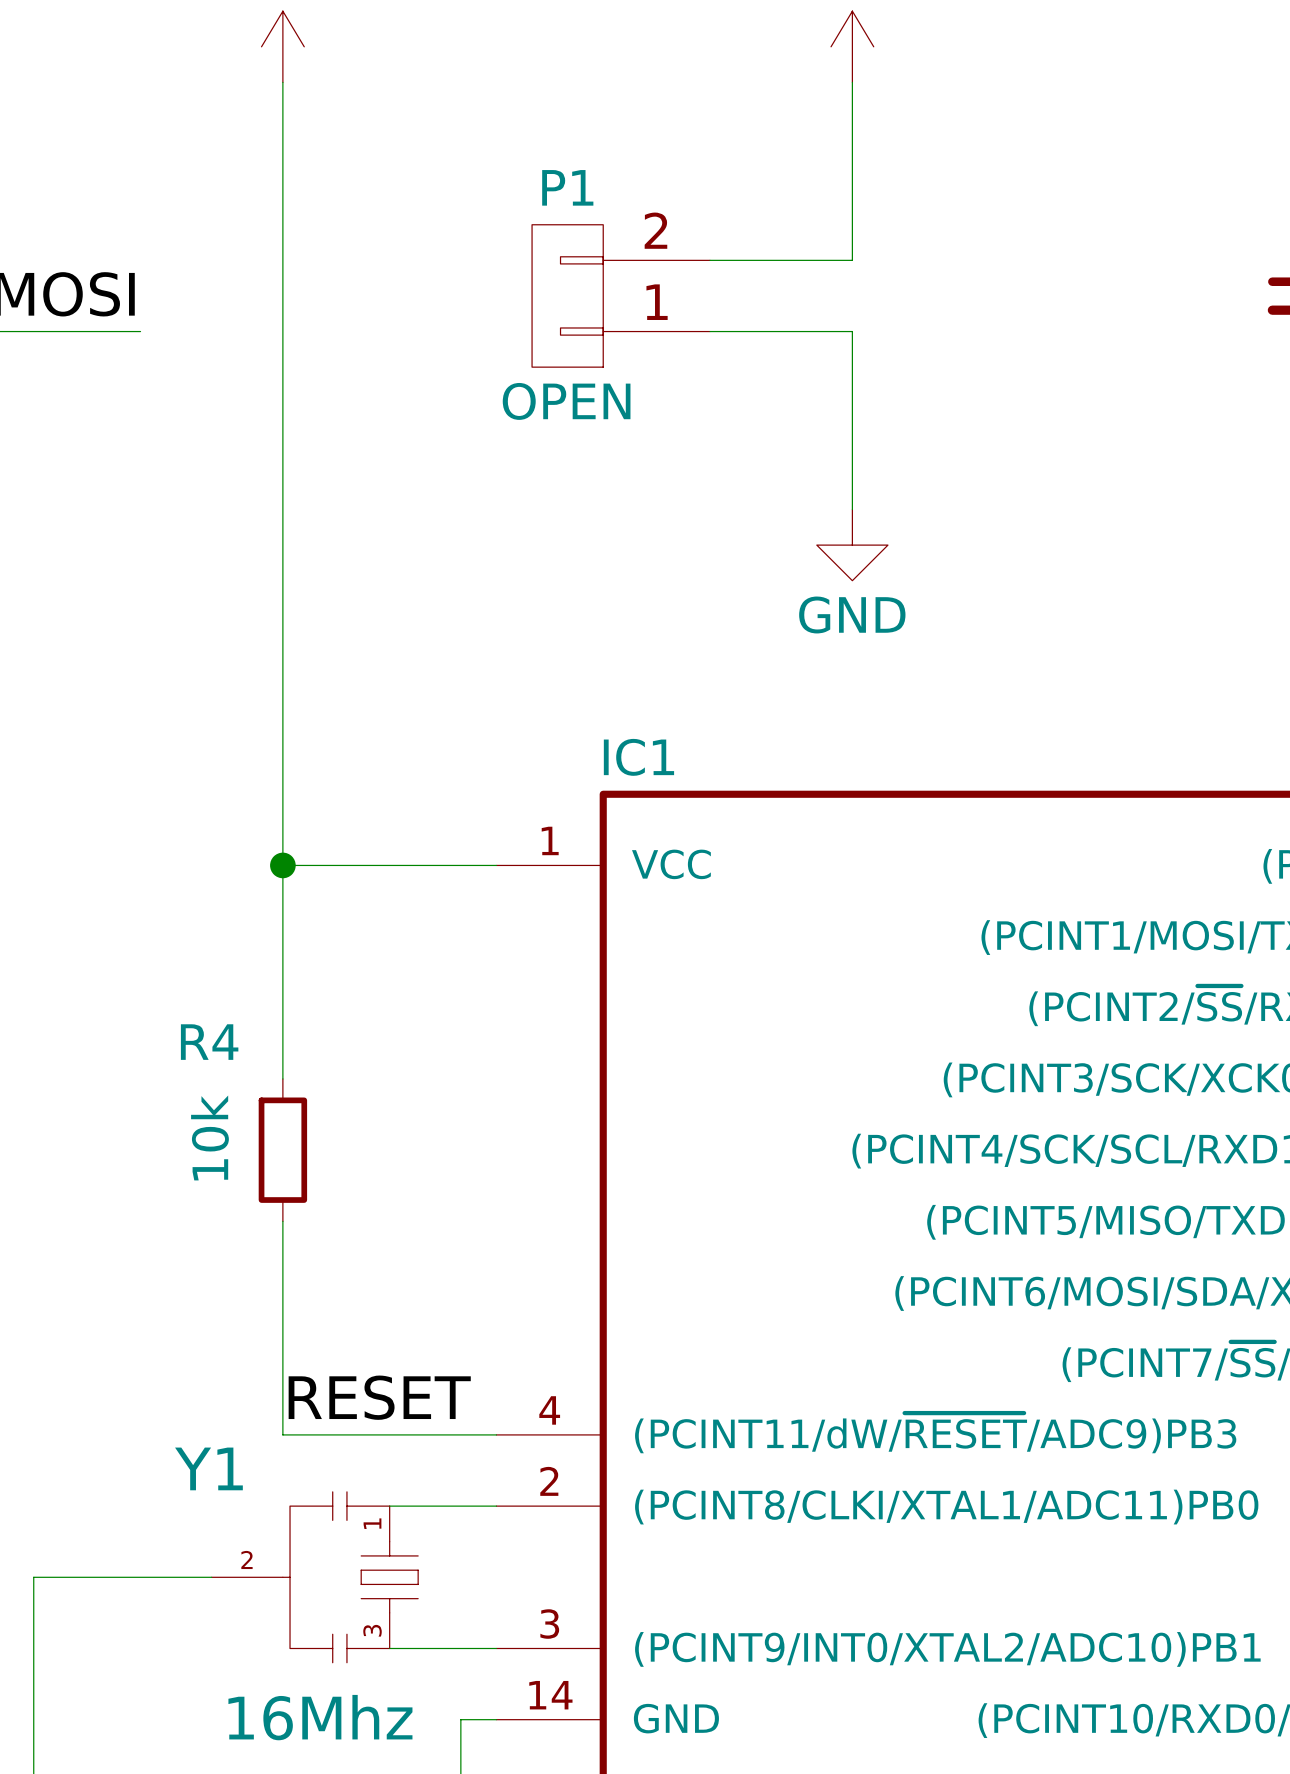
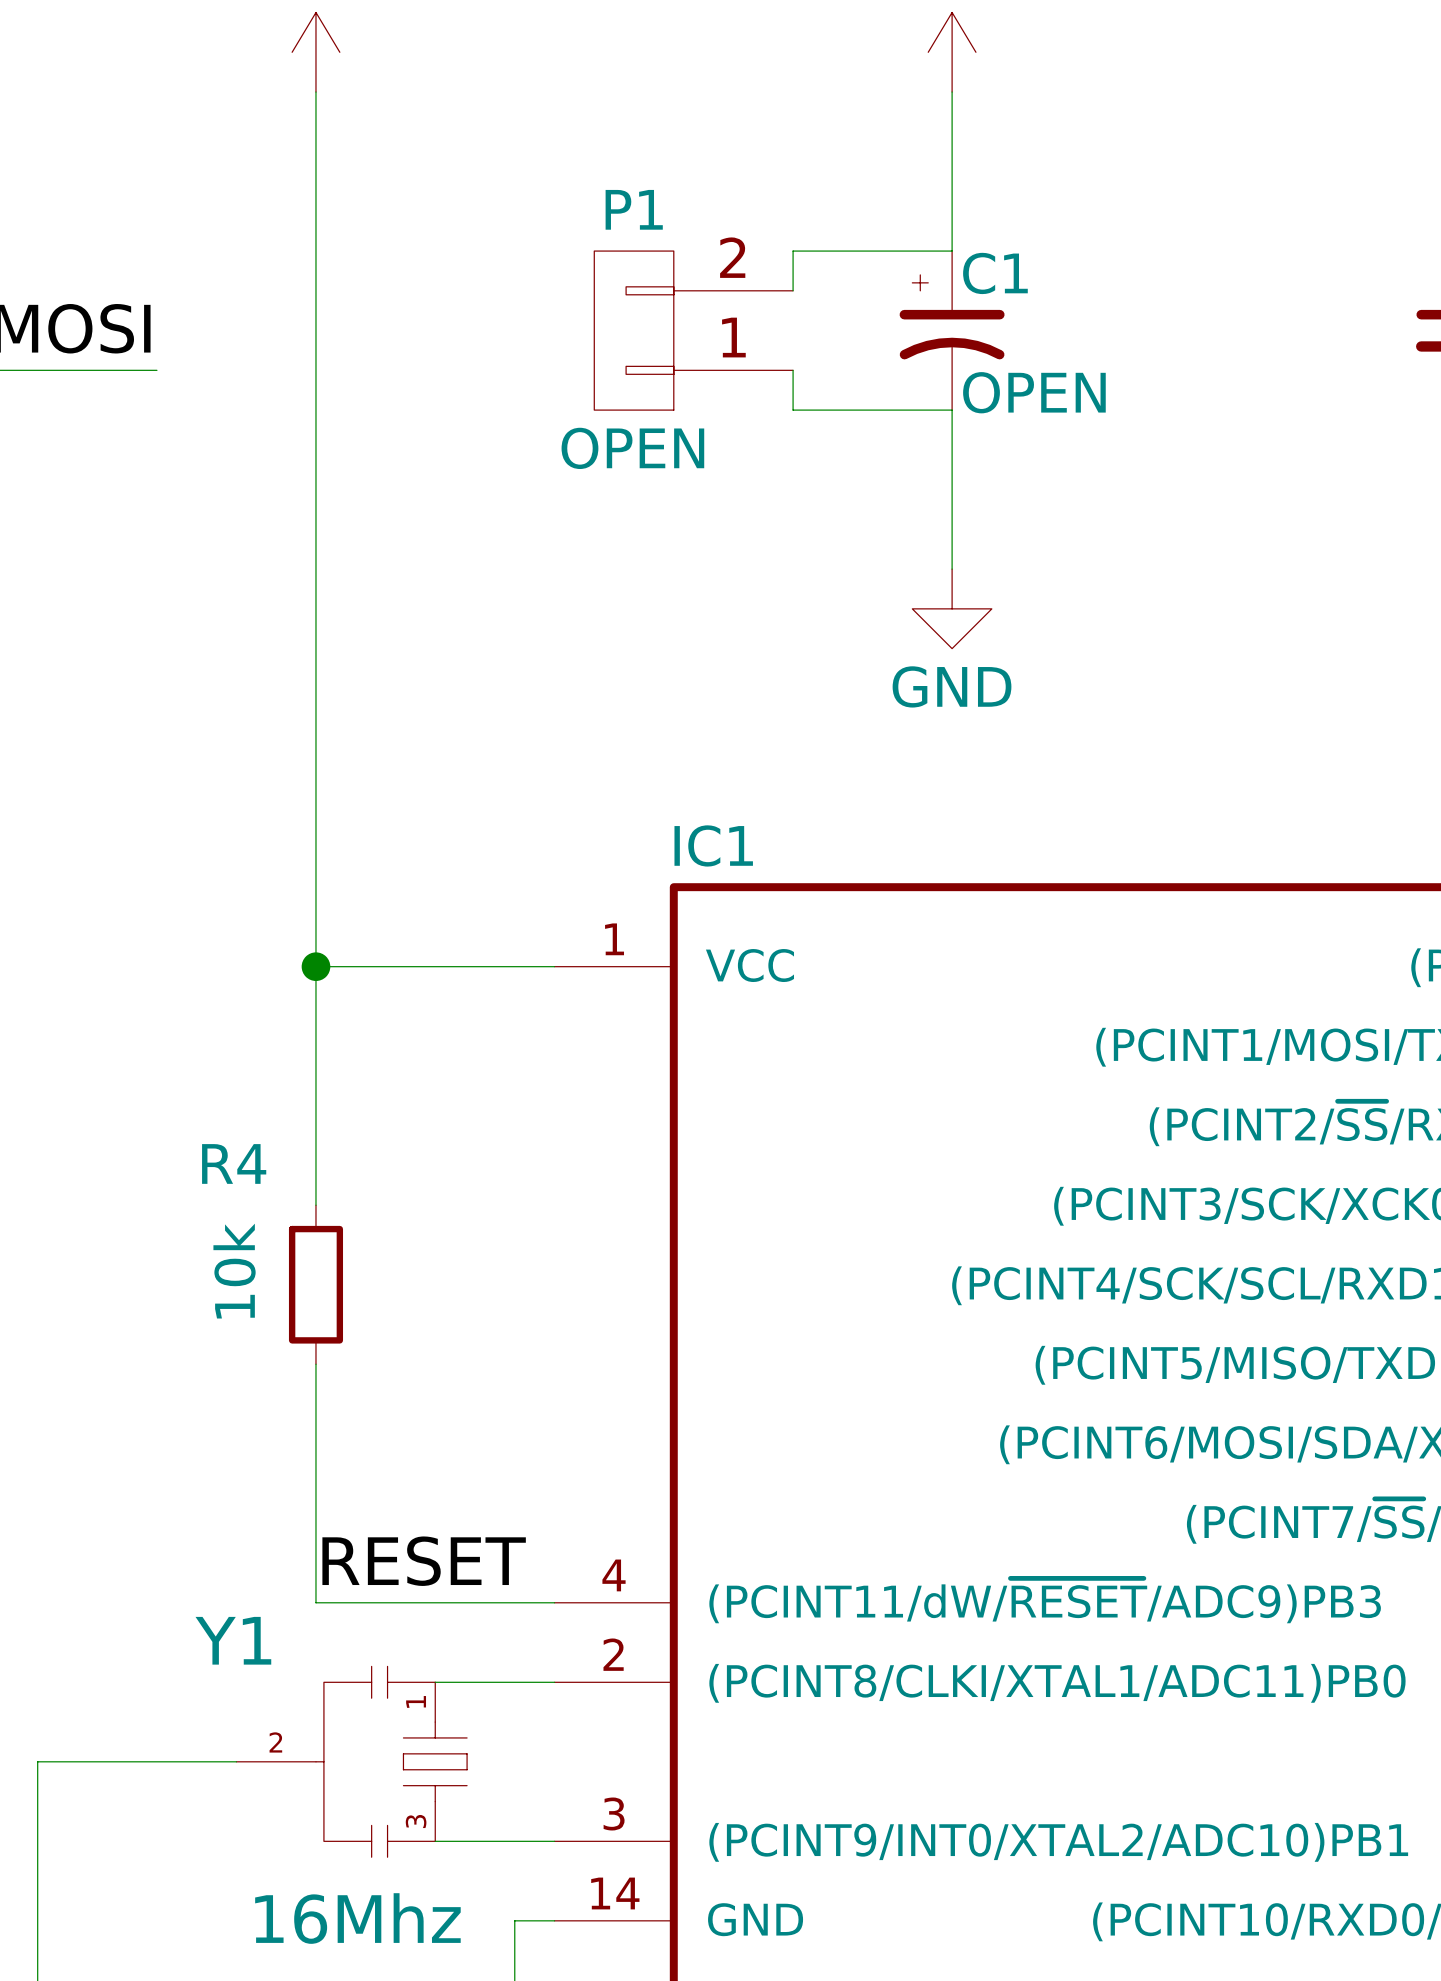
wire: (852, 224) (852, 260) (710, 260) -> (952, 251) (793, 251) (793, 290)
C1: none -> OPEN (952, 330)
wire: (710, 331) (852, 331) (852, 367) -> (793, 370) (793, 410) (952, 410)

